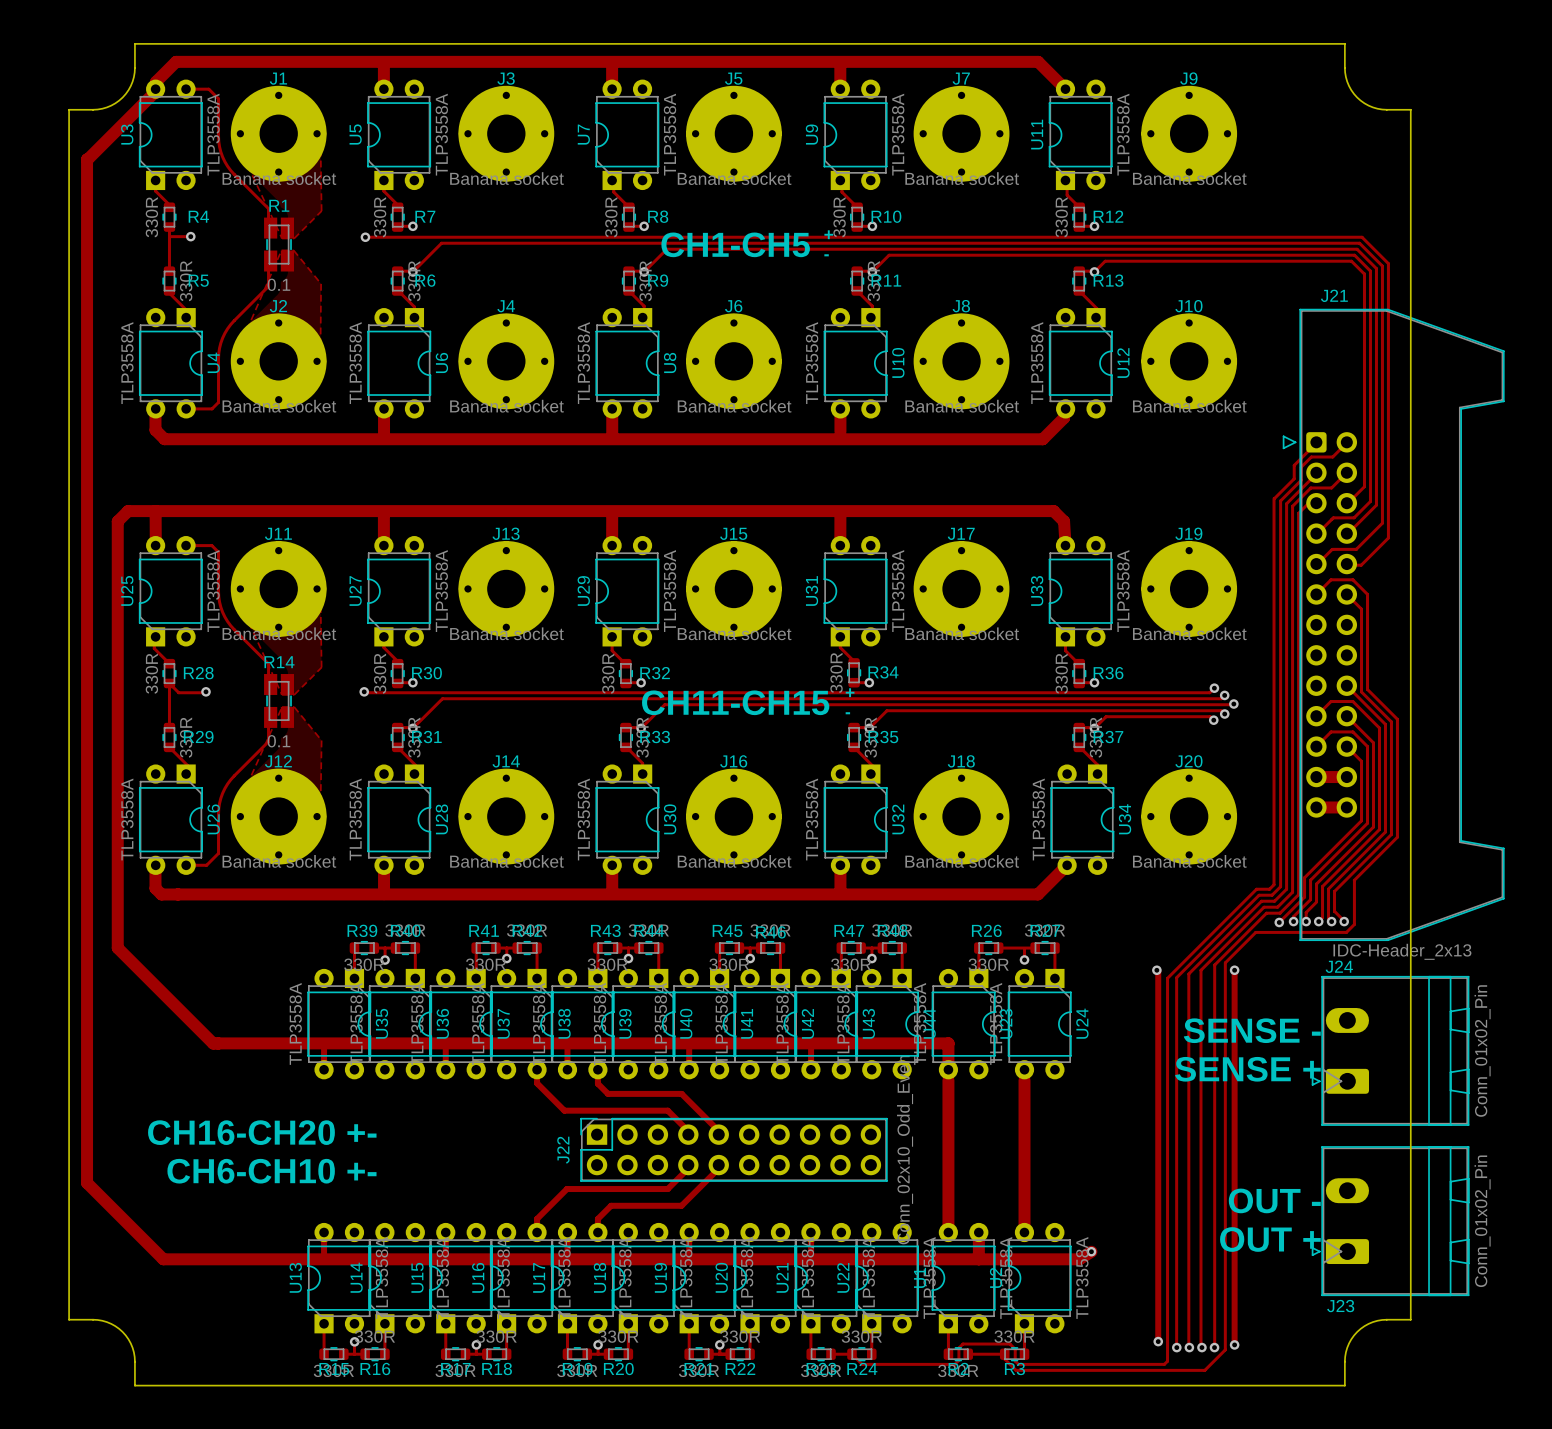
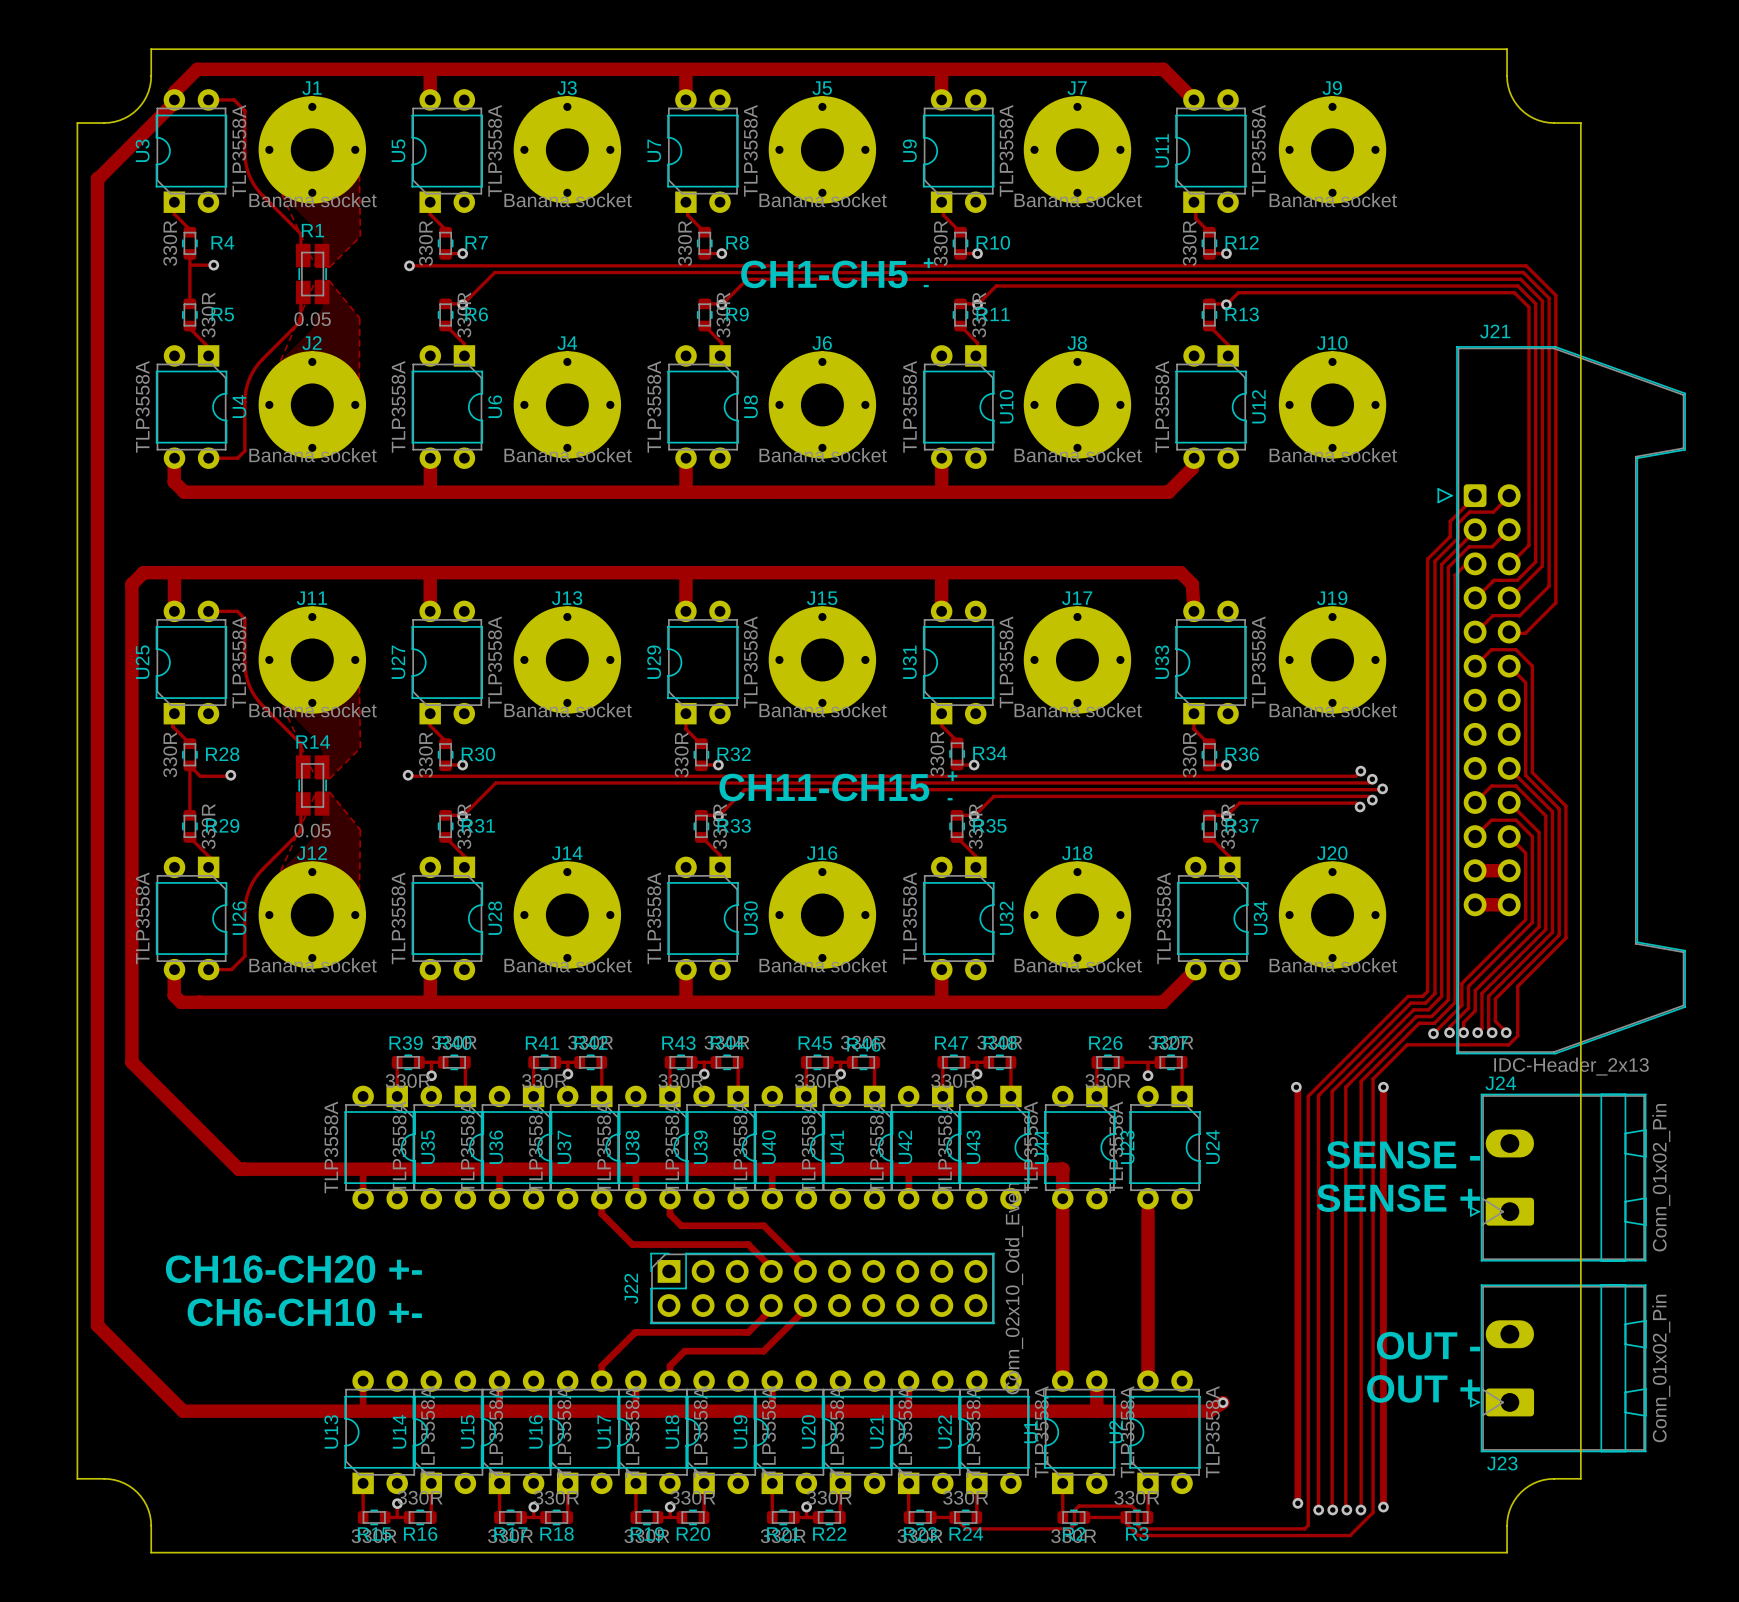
R1 value: 0.1 (278, 284) -> 0.05 (312, 319)
R14 value: 0.1 (278, 741) -> 0.05 (312, 830)

